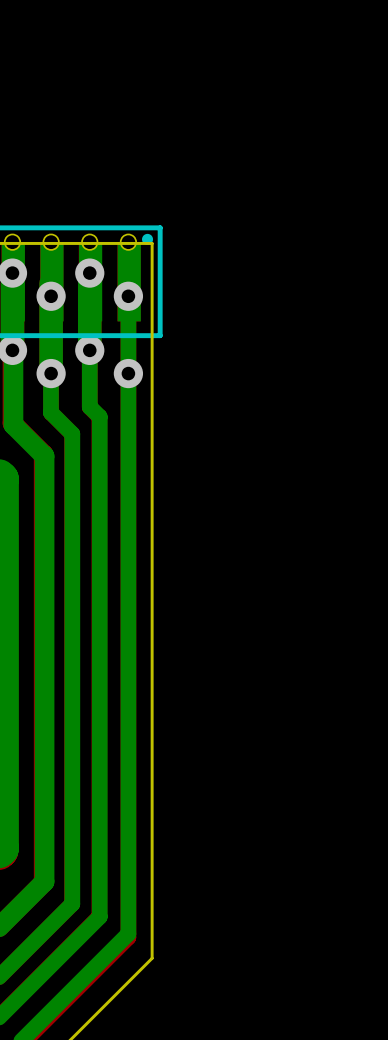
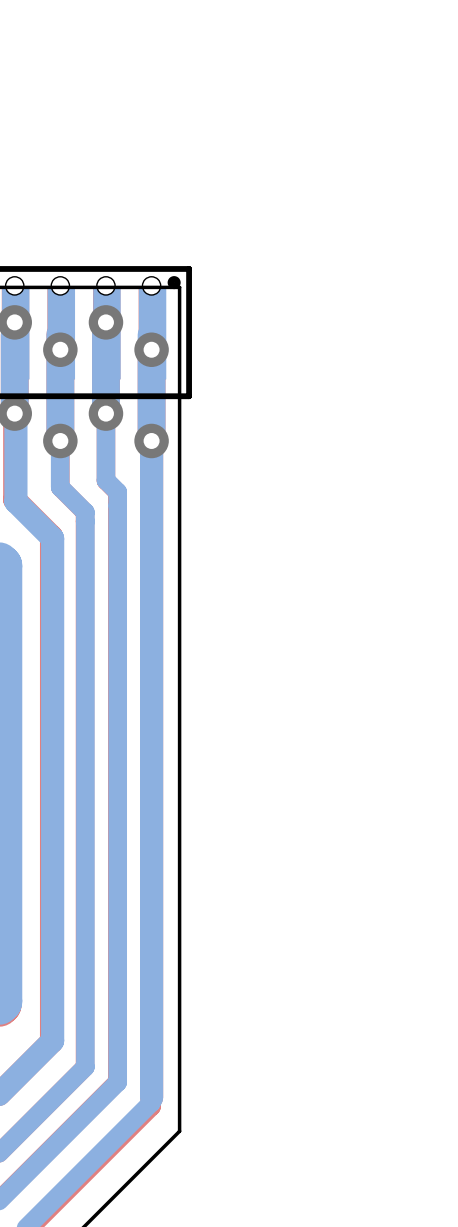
bottom track width: thin (128, 283) (128, 930) -> thick (151, 334) (151, 1097)

